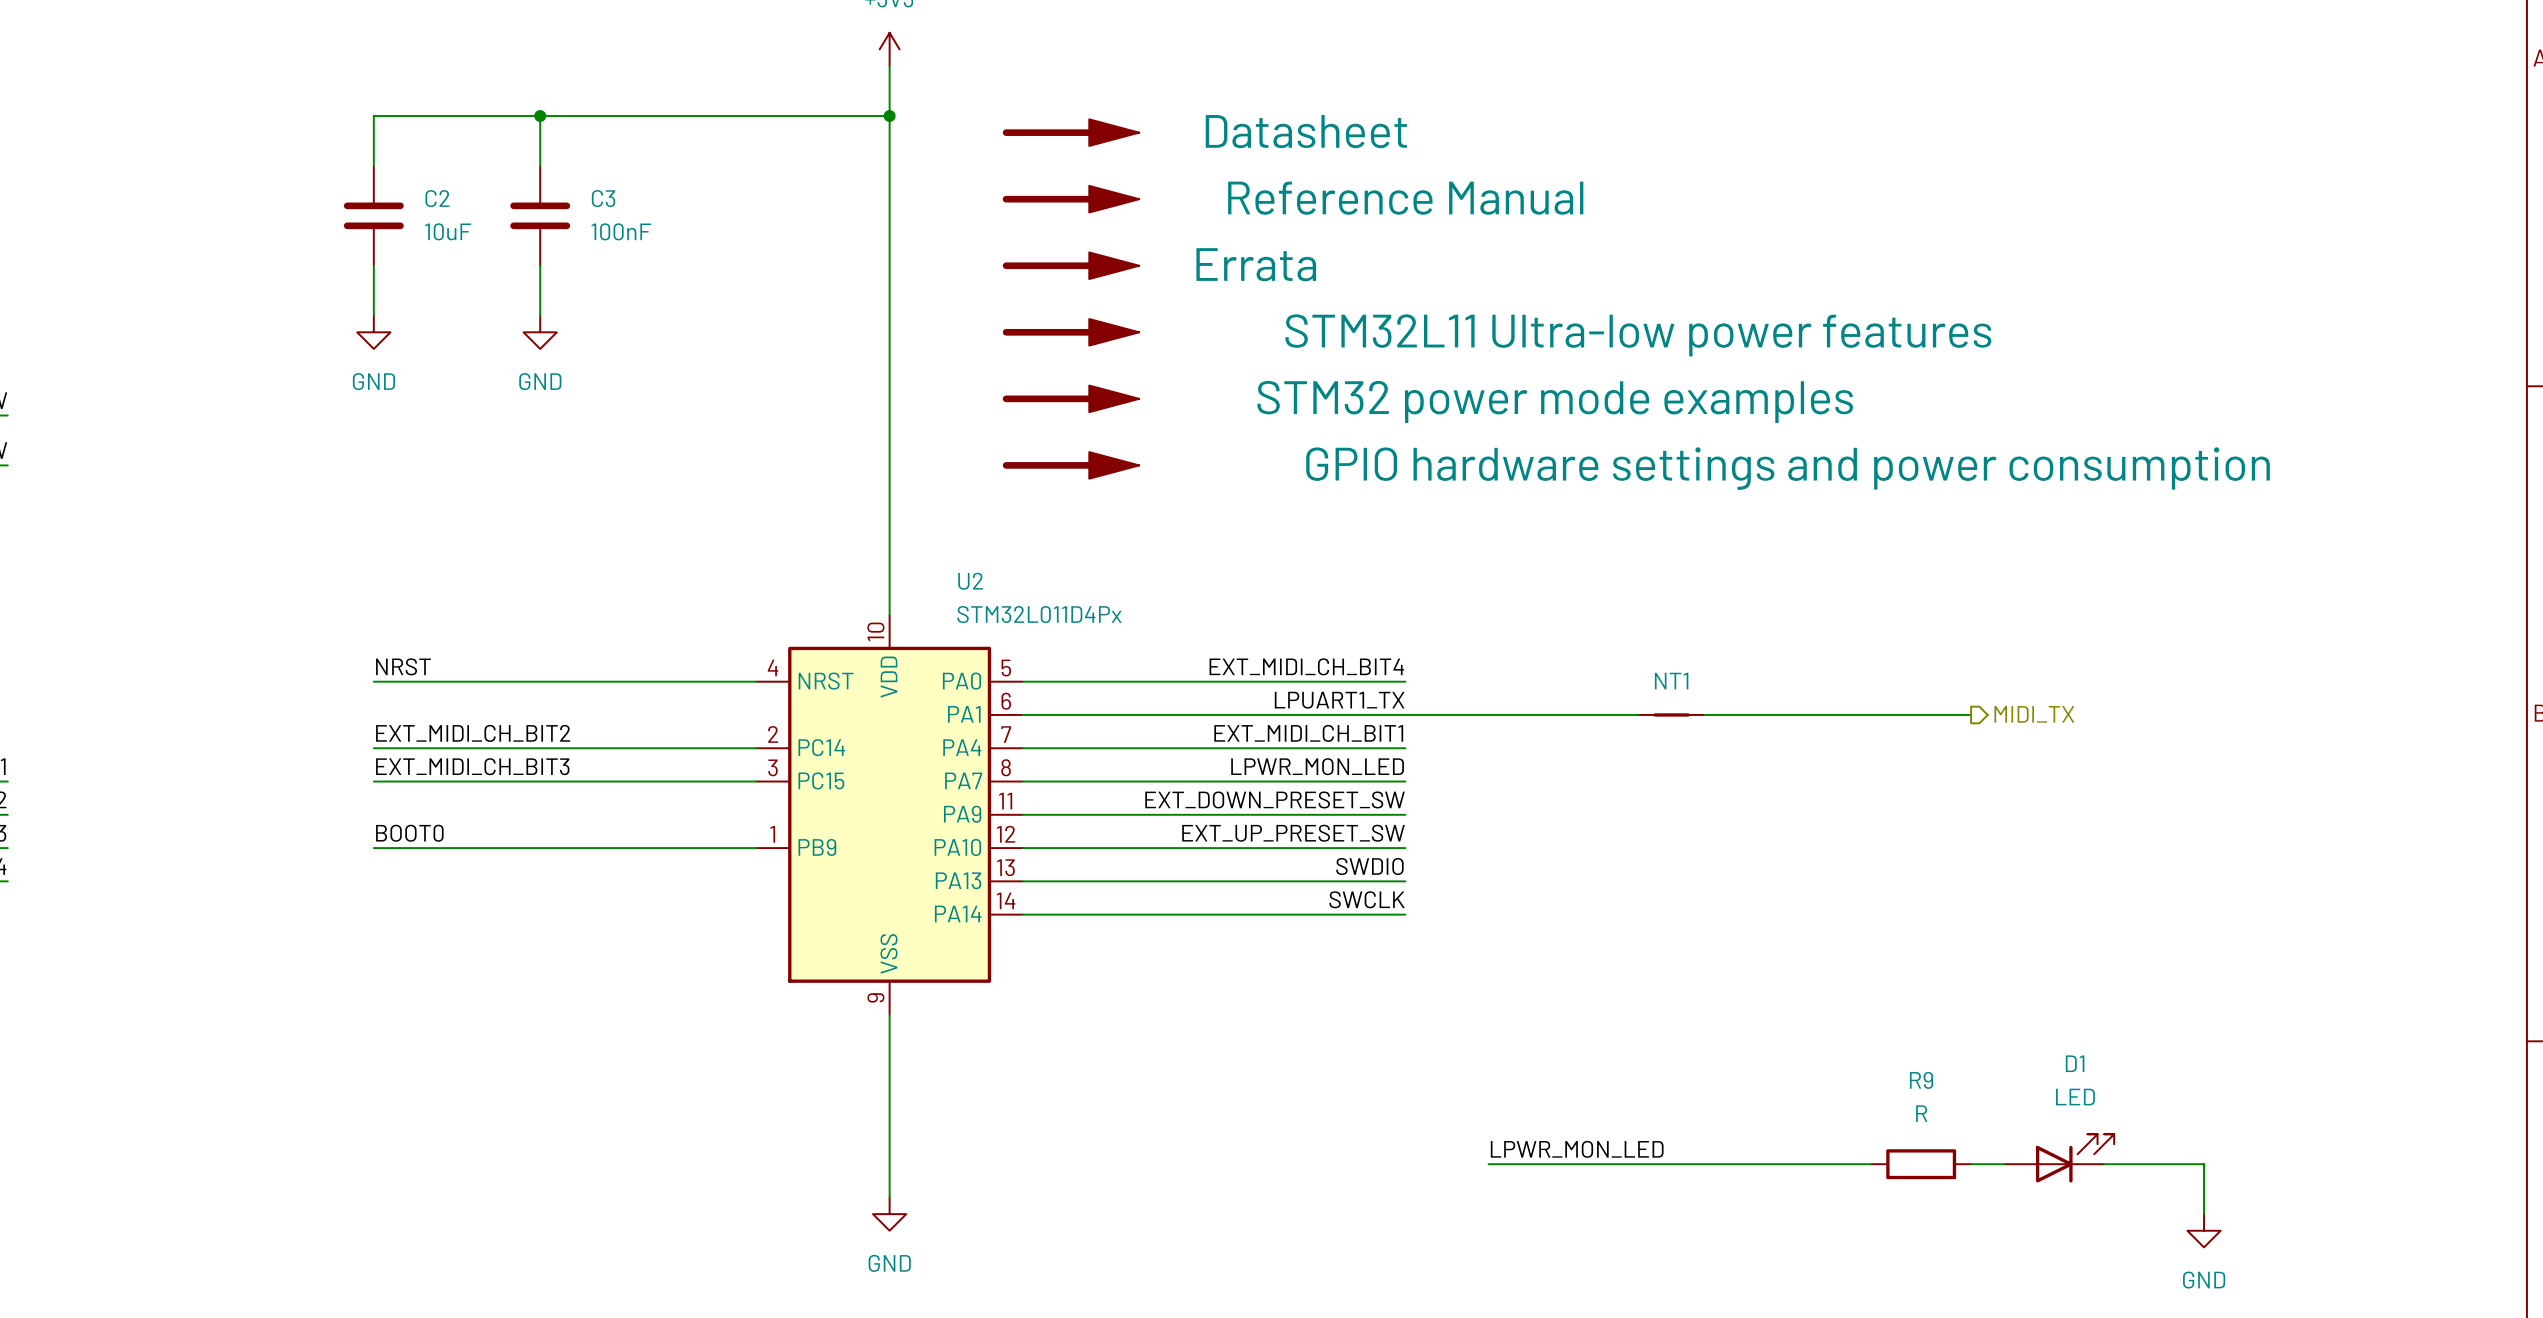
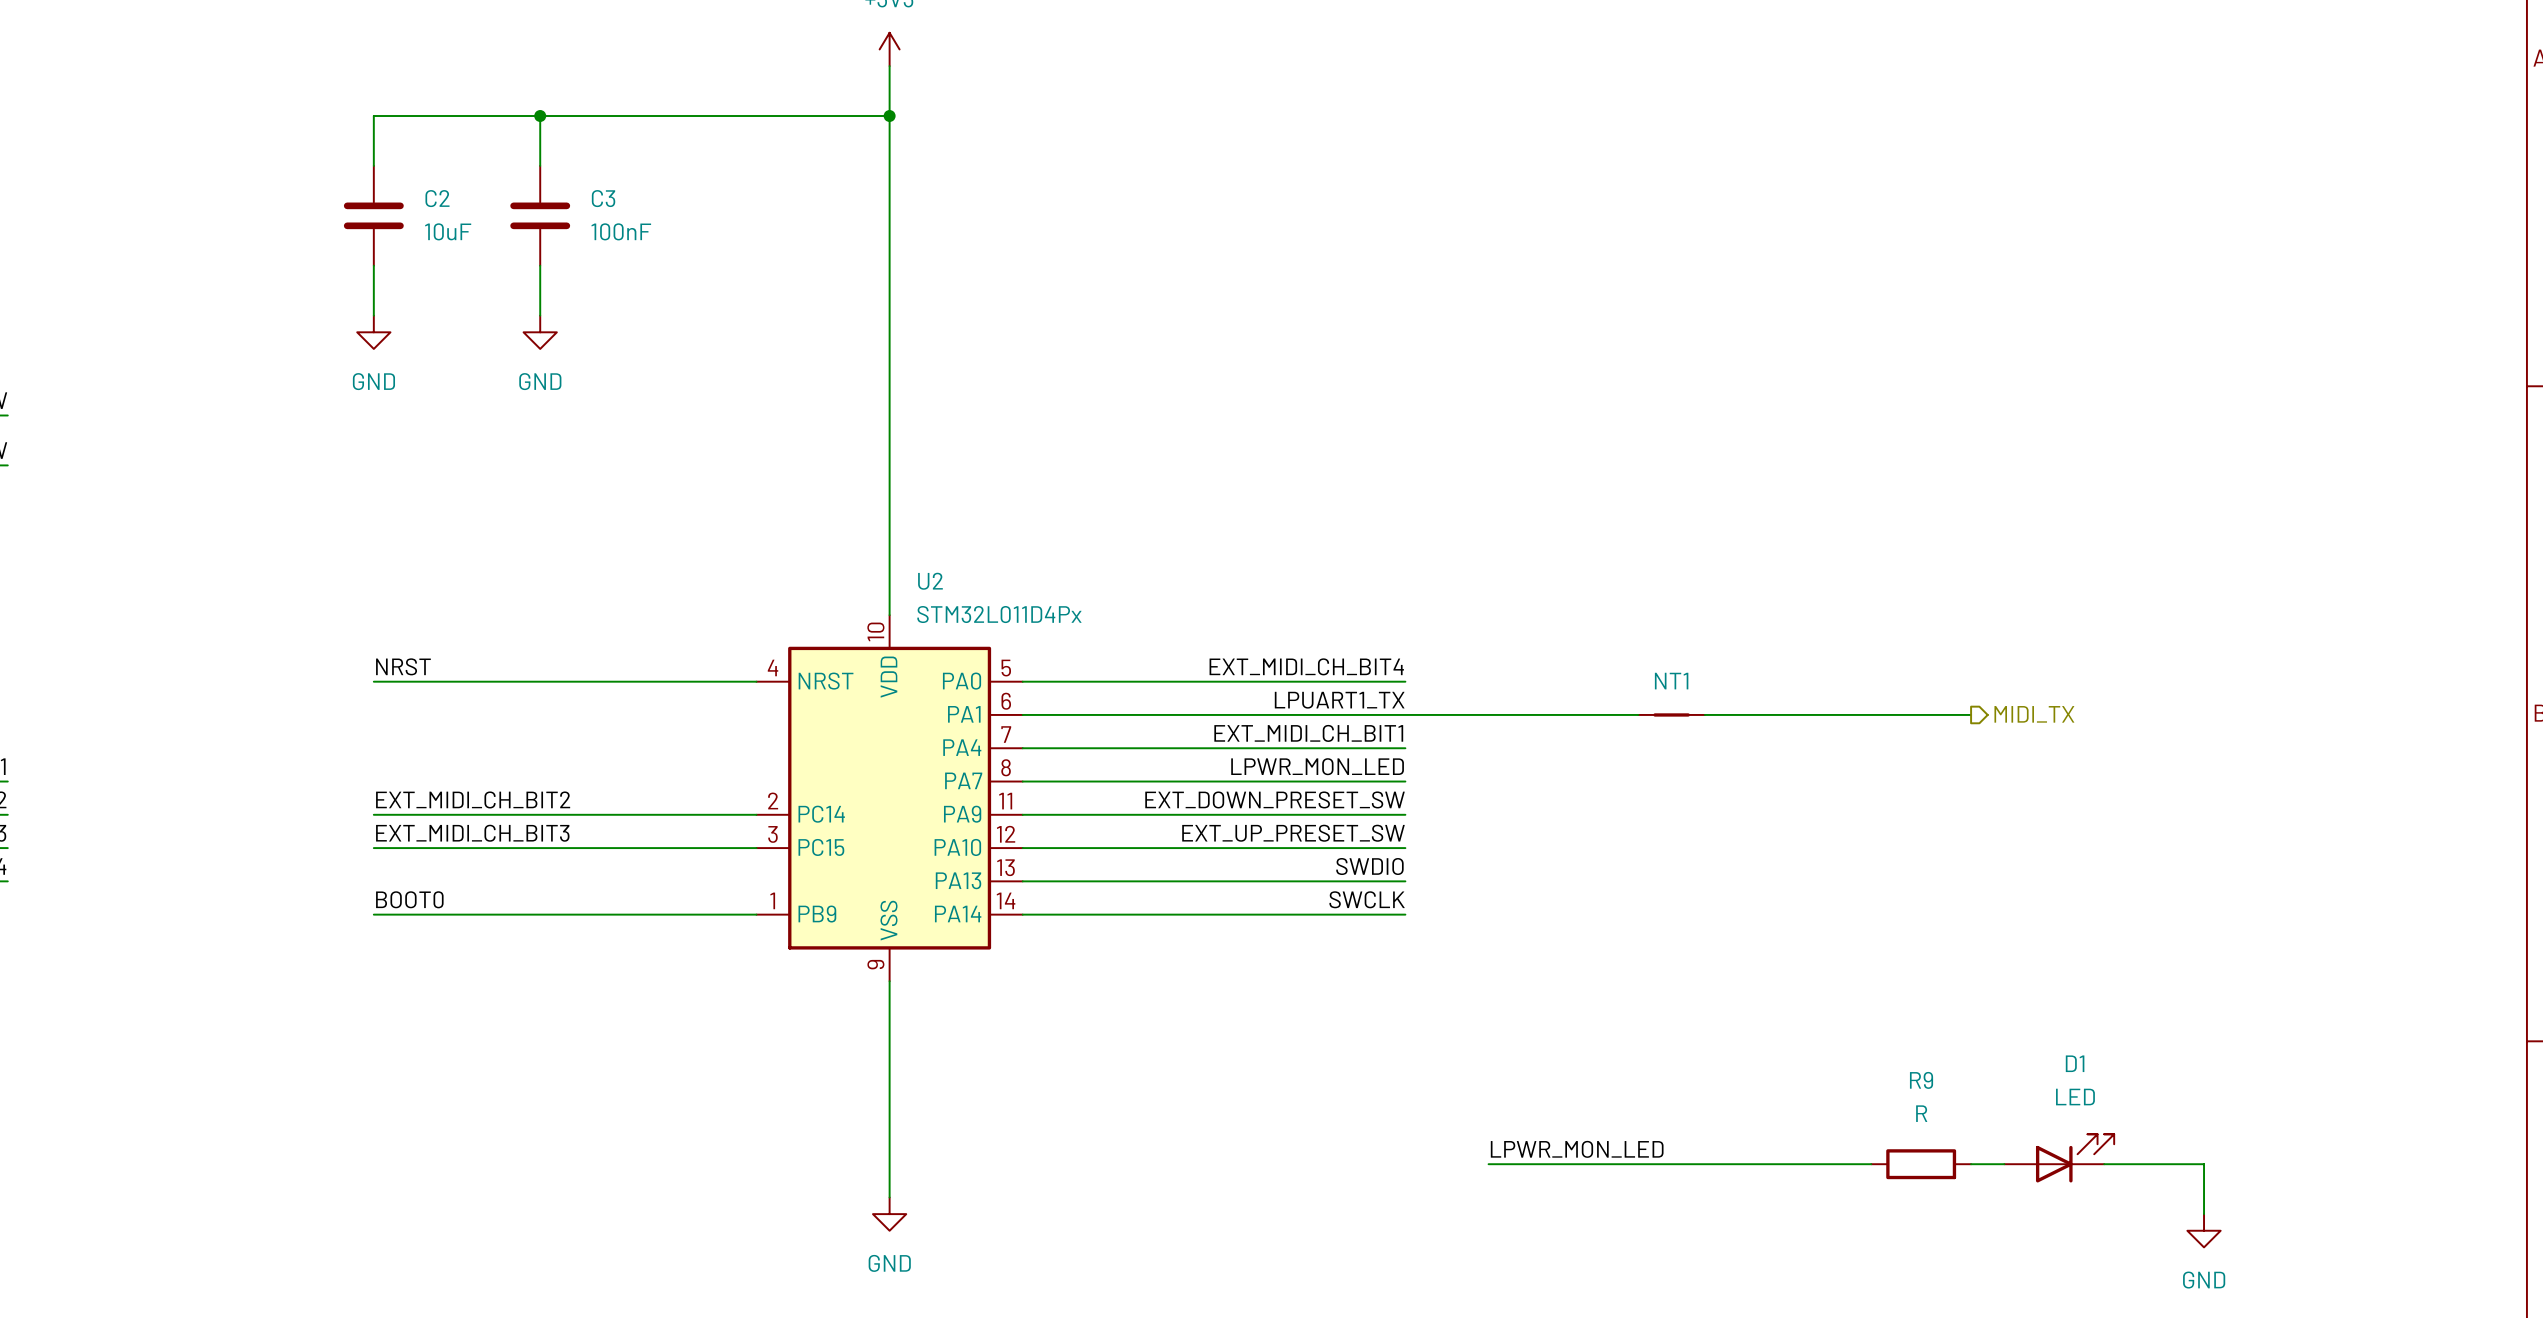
power symbol: (1070, 132) -> none
power symbol: (1070, 199) -> none
power symbol: (1070, 265) -> none
power symbol: (1070, 332) -> none
power symbol: (1070, 398) -> none
power symbol: (1070, 465) -> none
U2 name position: U2 (970, 581) -> U2 (930, 581)
U2 value position: STM32L011D4Px (1039, 614) -> STM32L011D4Px (999, 614)
U2 symbol: [756, 615, 1023, 1015] -> [756, 615, 1023, 982]
label position: EXT_MIDI_CH_BIT2 (473, 733) -> EXT_MIDI_CH_BIT2 (473, 799)
wire: (373, 748) (756, 748) -> (373, 914) (756, 914)
label: EXT_MIDI_CH_BIT3 (472, 766) -> none
wire: (373, 781) (756, 781) -> (373, 814) (756, 814)
label: BOOT0 (409, 833) -> EXT_MIDI_CH_BIT3 (472, 833)
label: none -> BOOT0 (409, 899)

